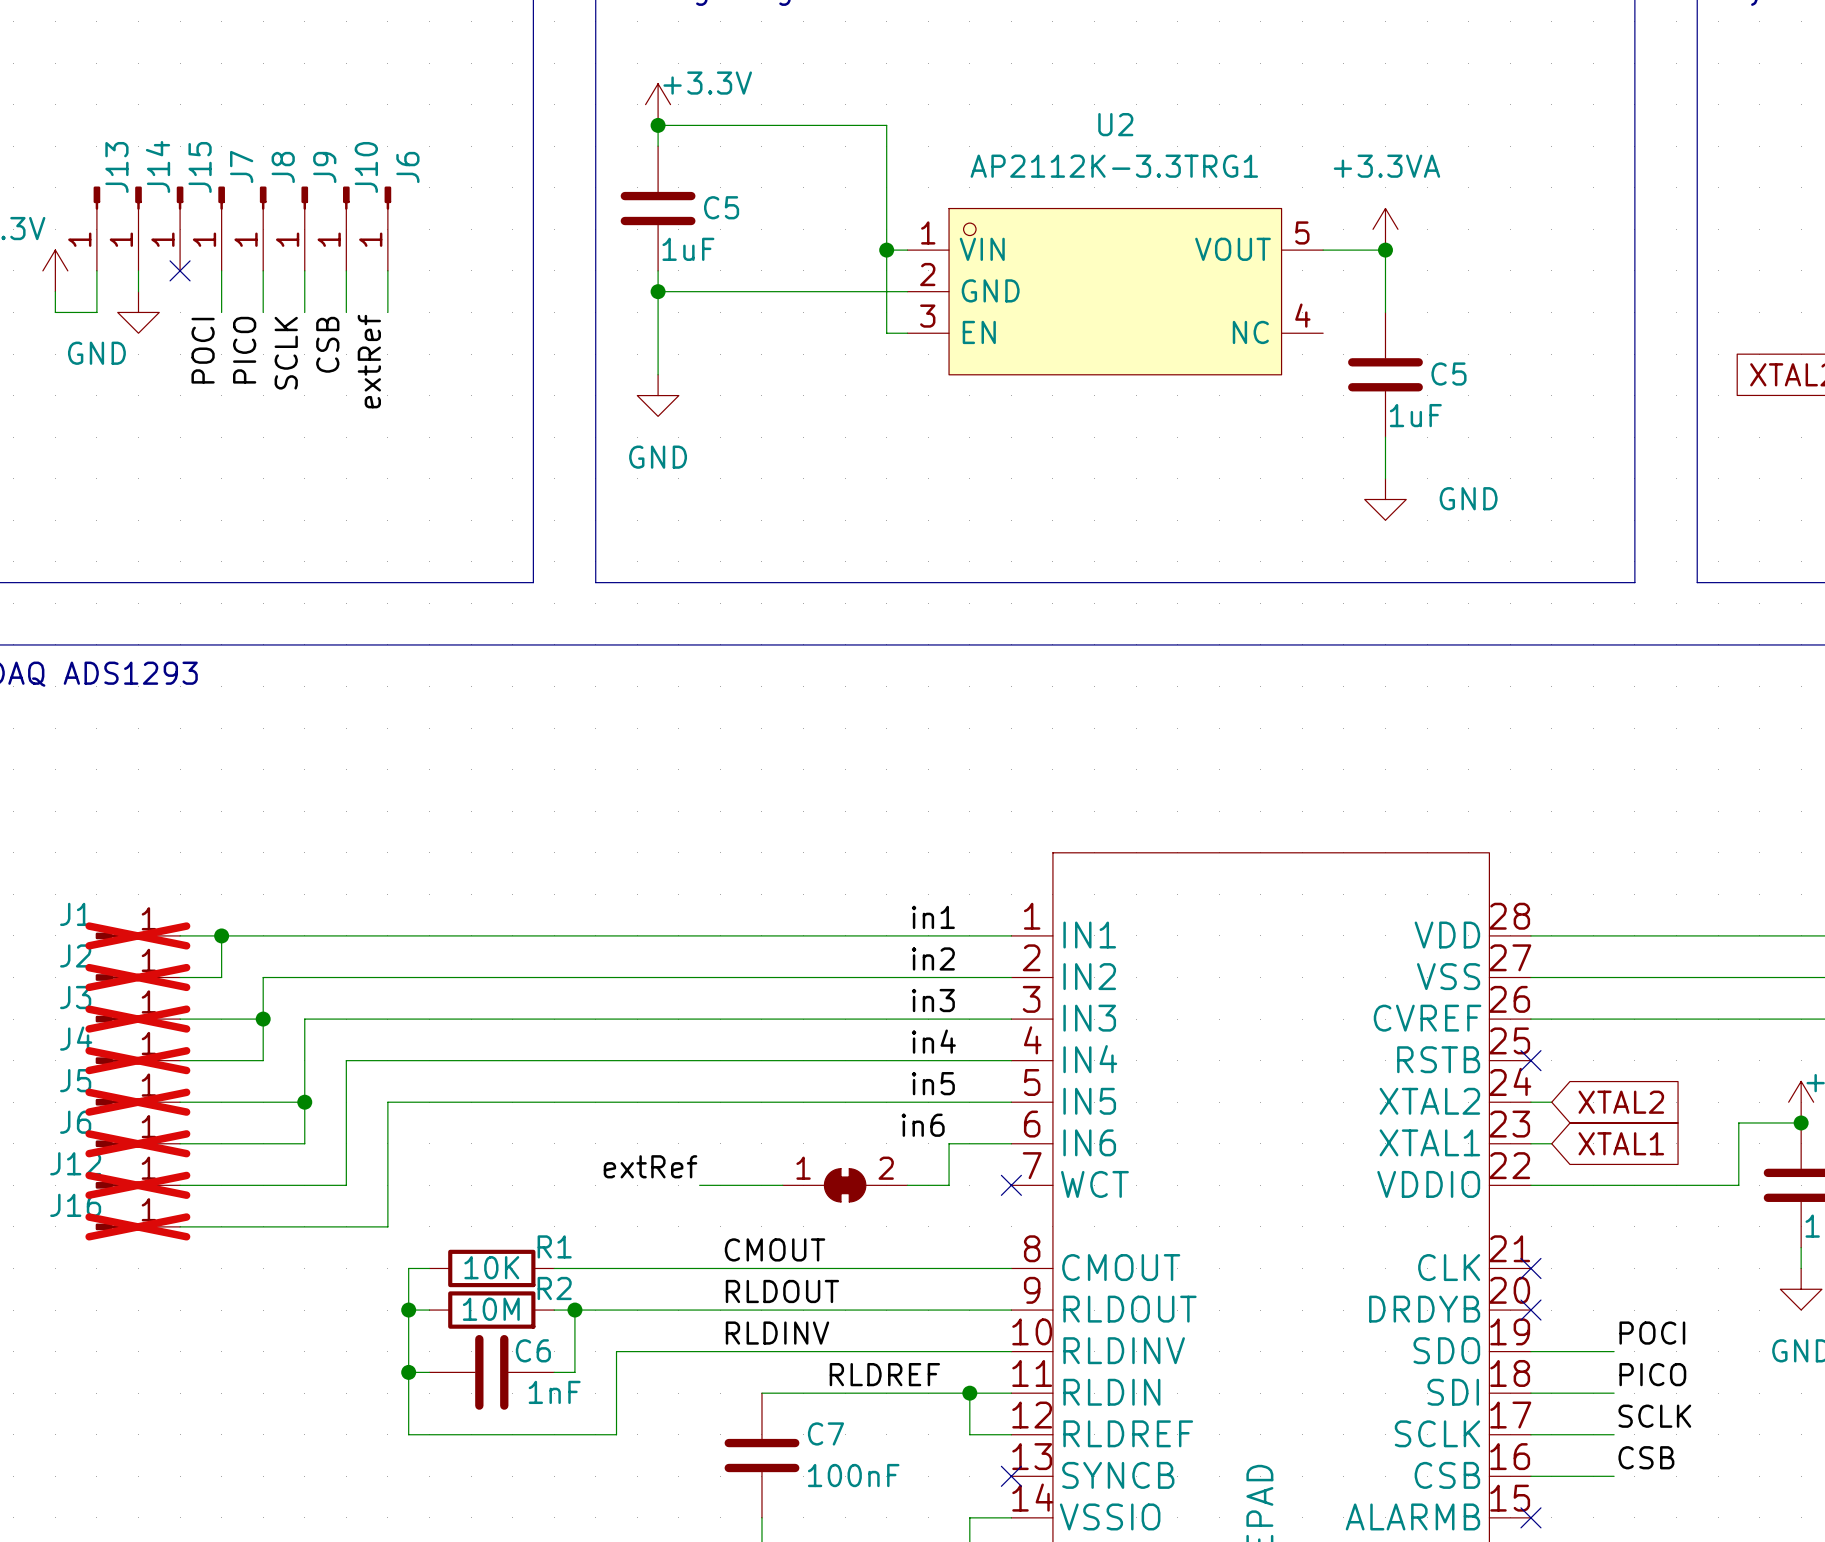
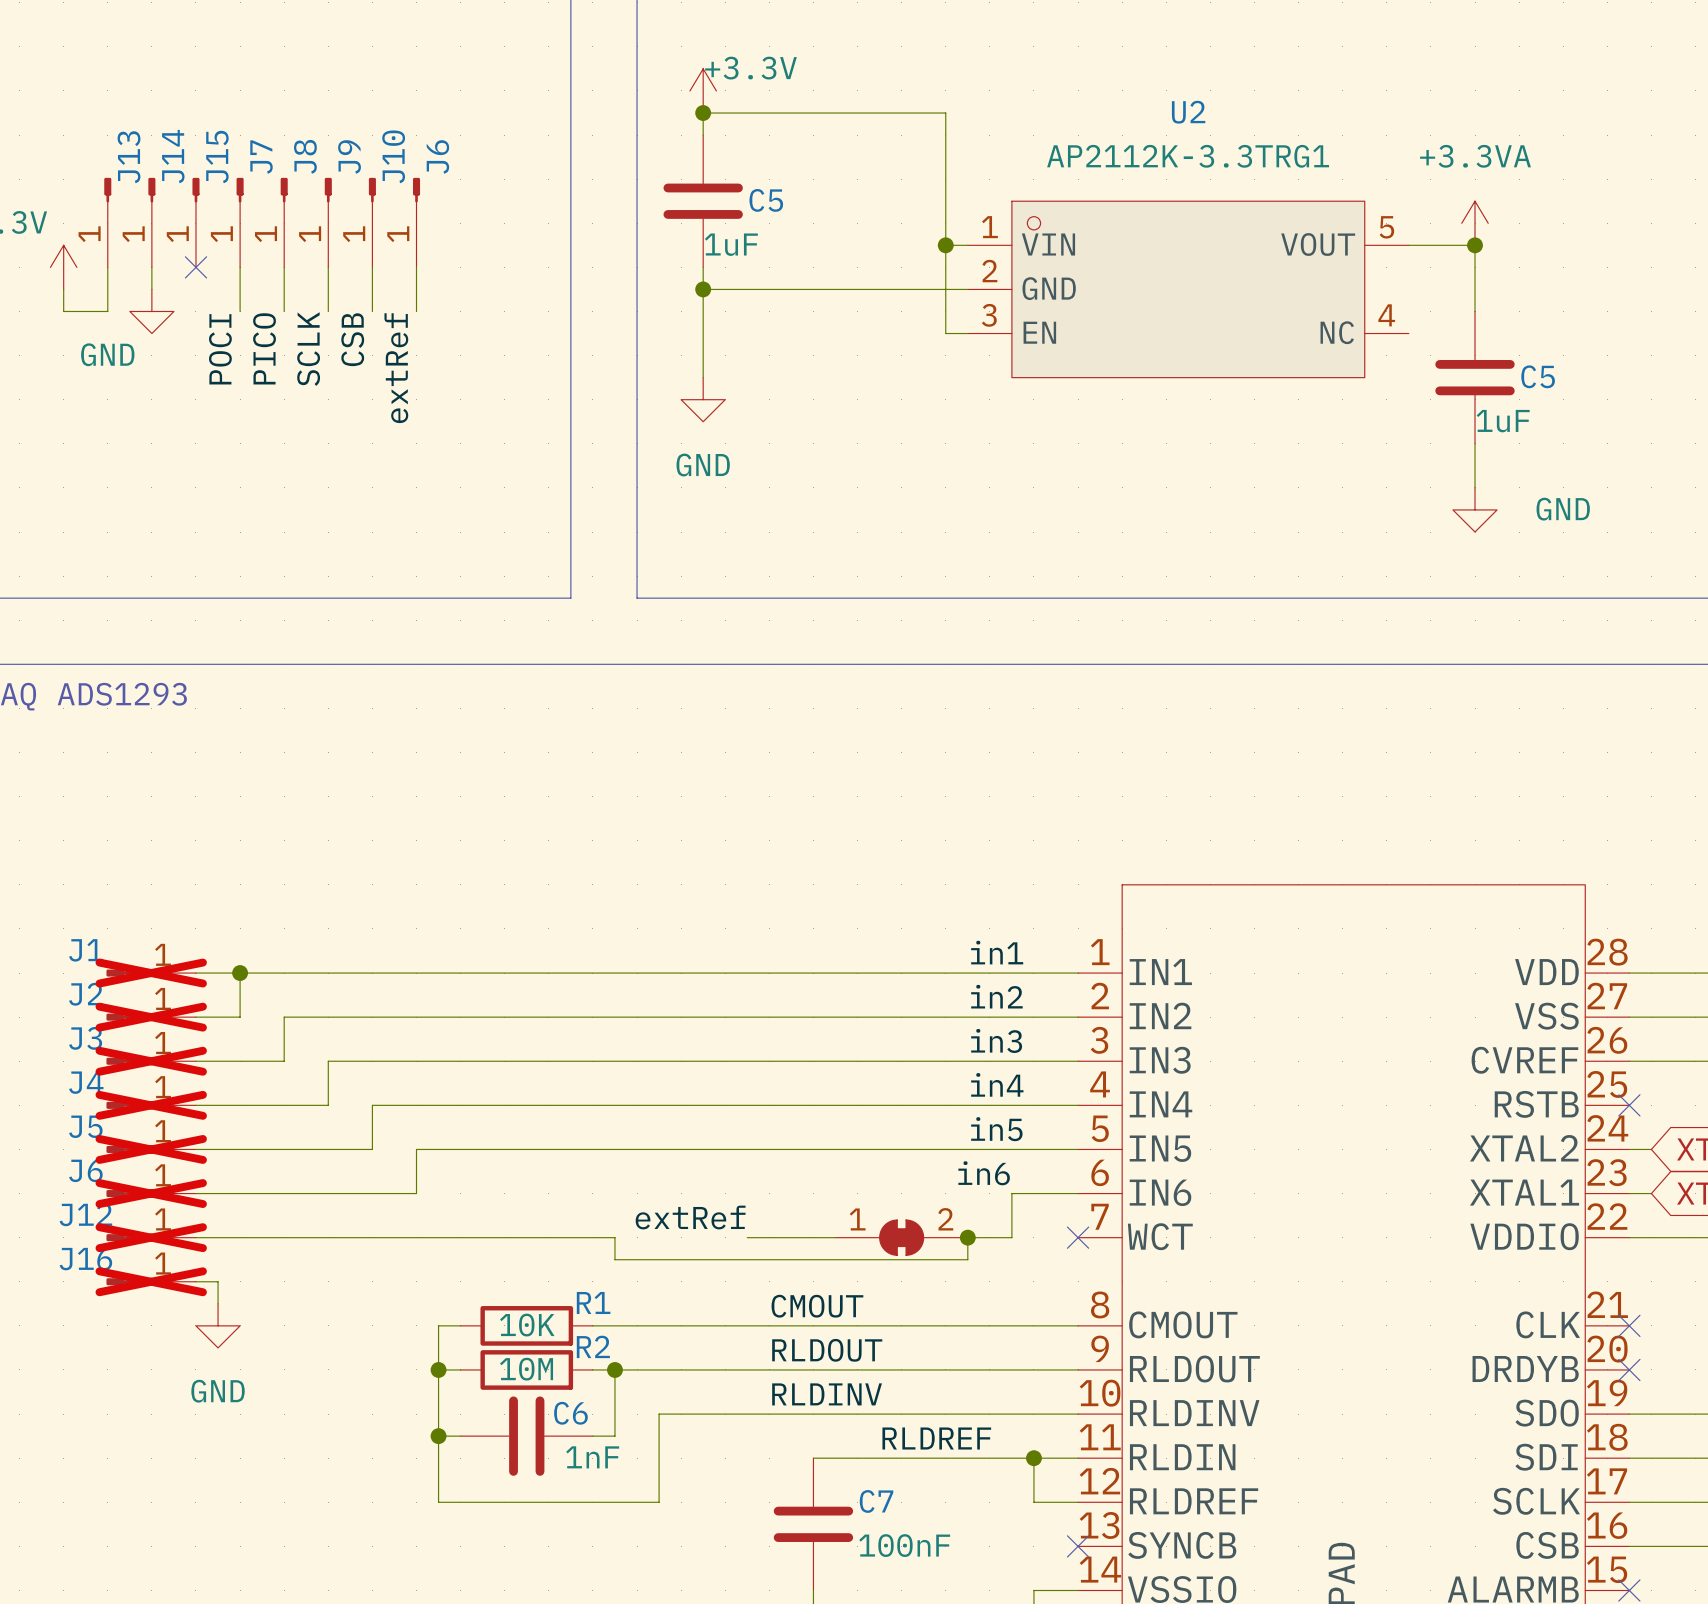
wire: (263, 1019) (263, 1060) -> (328, 1105) (284, 1105)
junction: (263, 1019) -> none
wire: (304, 1060) (304, 1143) -> (416, 1193) (328, 1193)
junction: (304, 1102) -> none
wire: (346, 1102) (346, 1185) -> (372, 1149) (328, 1149)
wire: (387, 1143) (387, 1226) (200, 1226) -> (218, 1303) (218, 1281)
wire: none -> (372, 1237) (614, 1237) (614, 1259) (967, 1259) (967, 1237)
junction: none -> (967, 1237)
power symbol: none -> GND (218, 1325)

